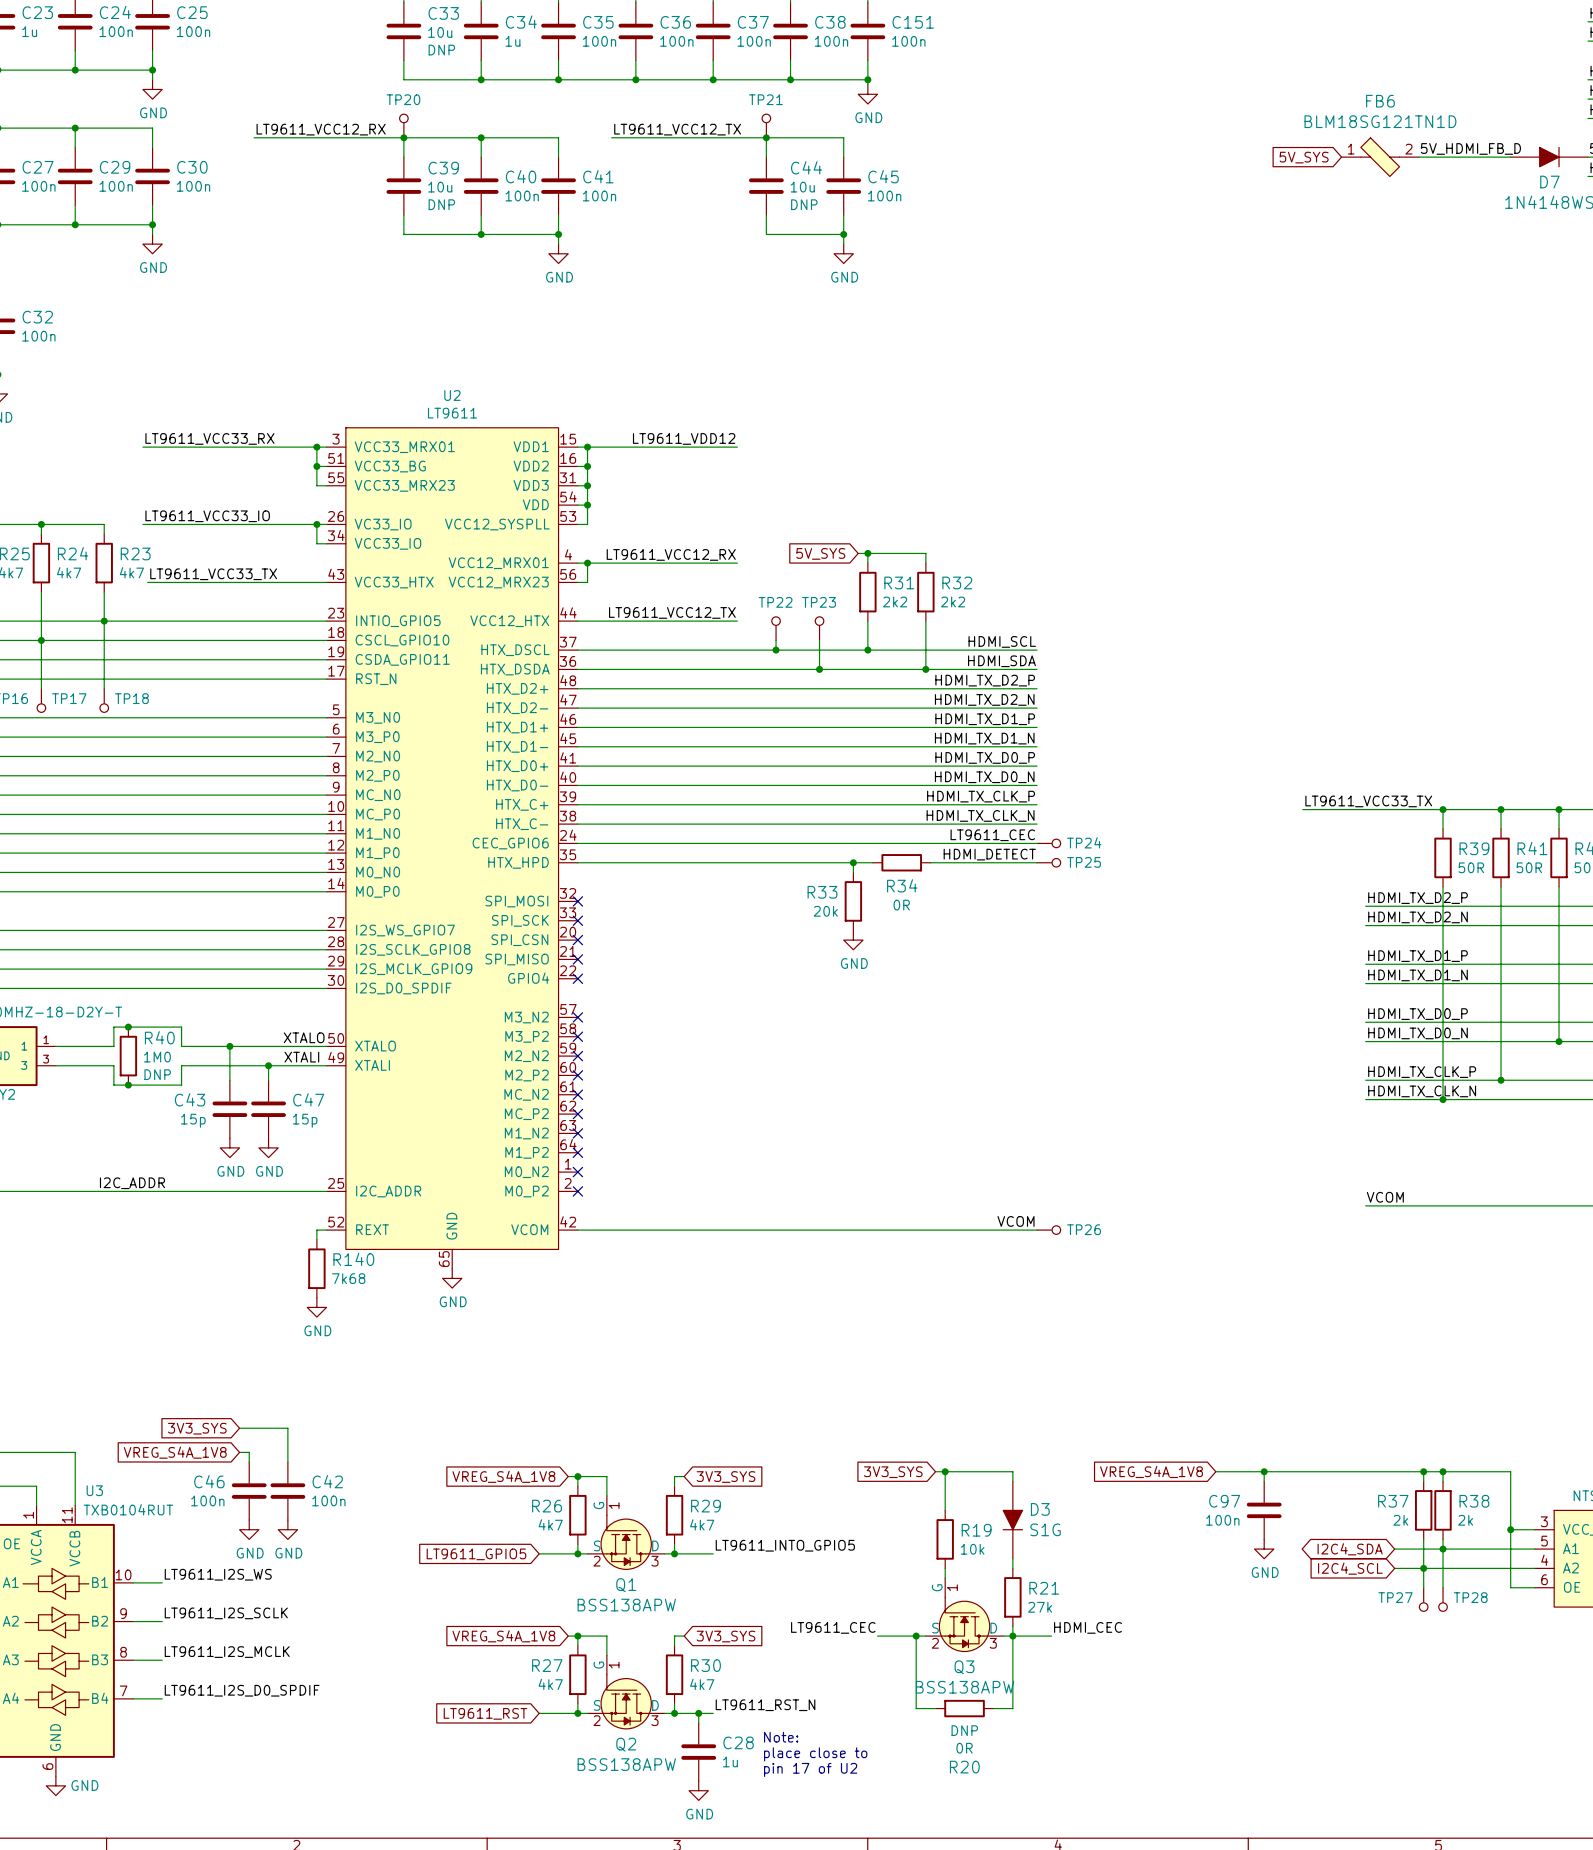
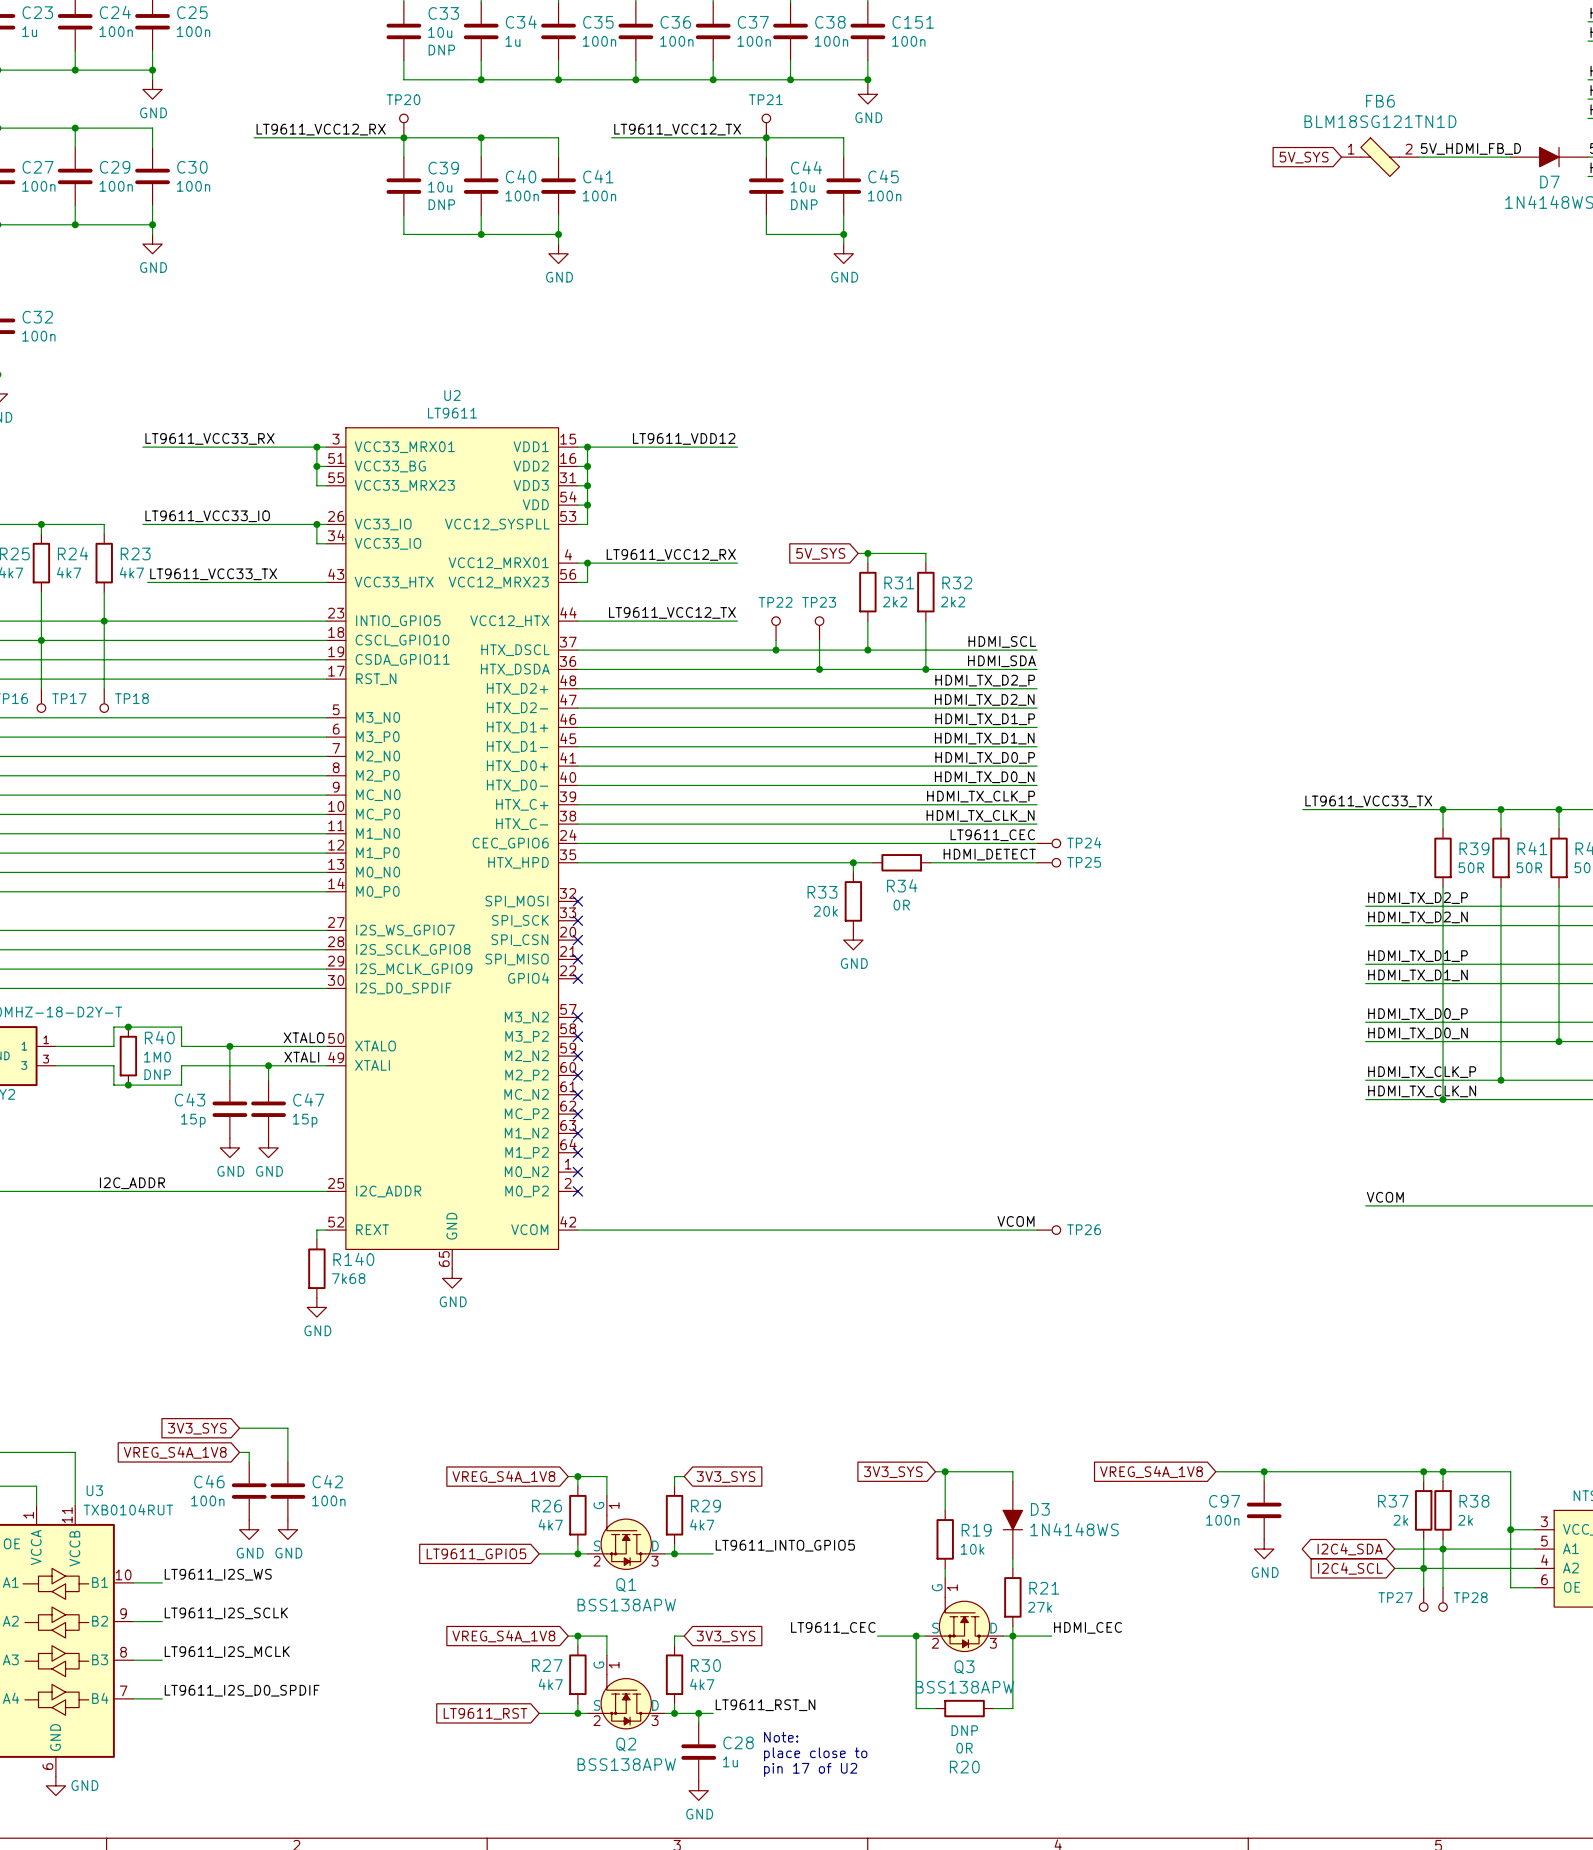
D3 value: S1G (1045, 1529) -> 1N4148WS (1074, 1529)

